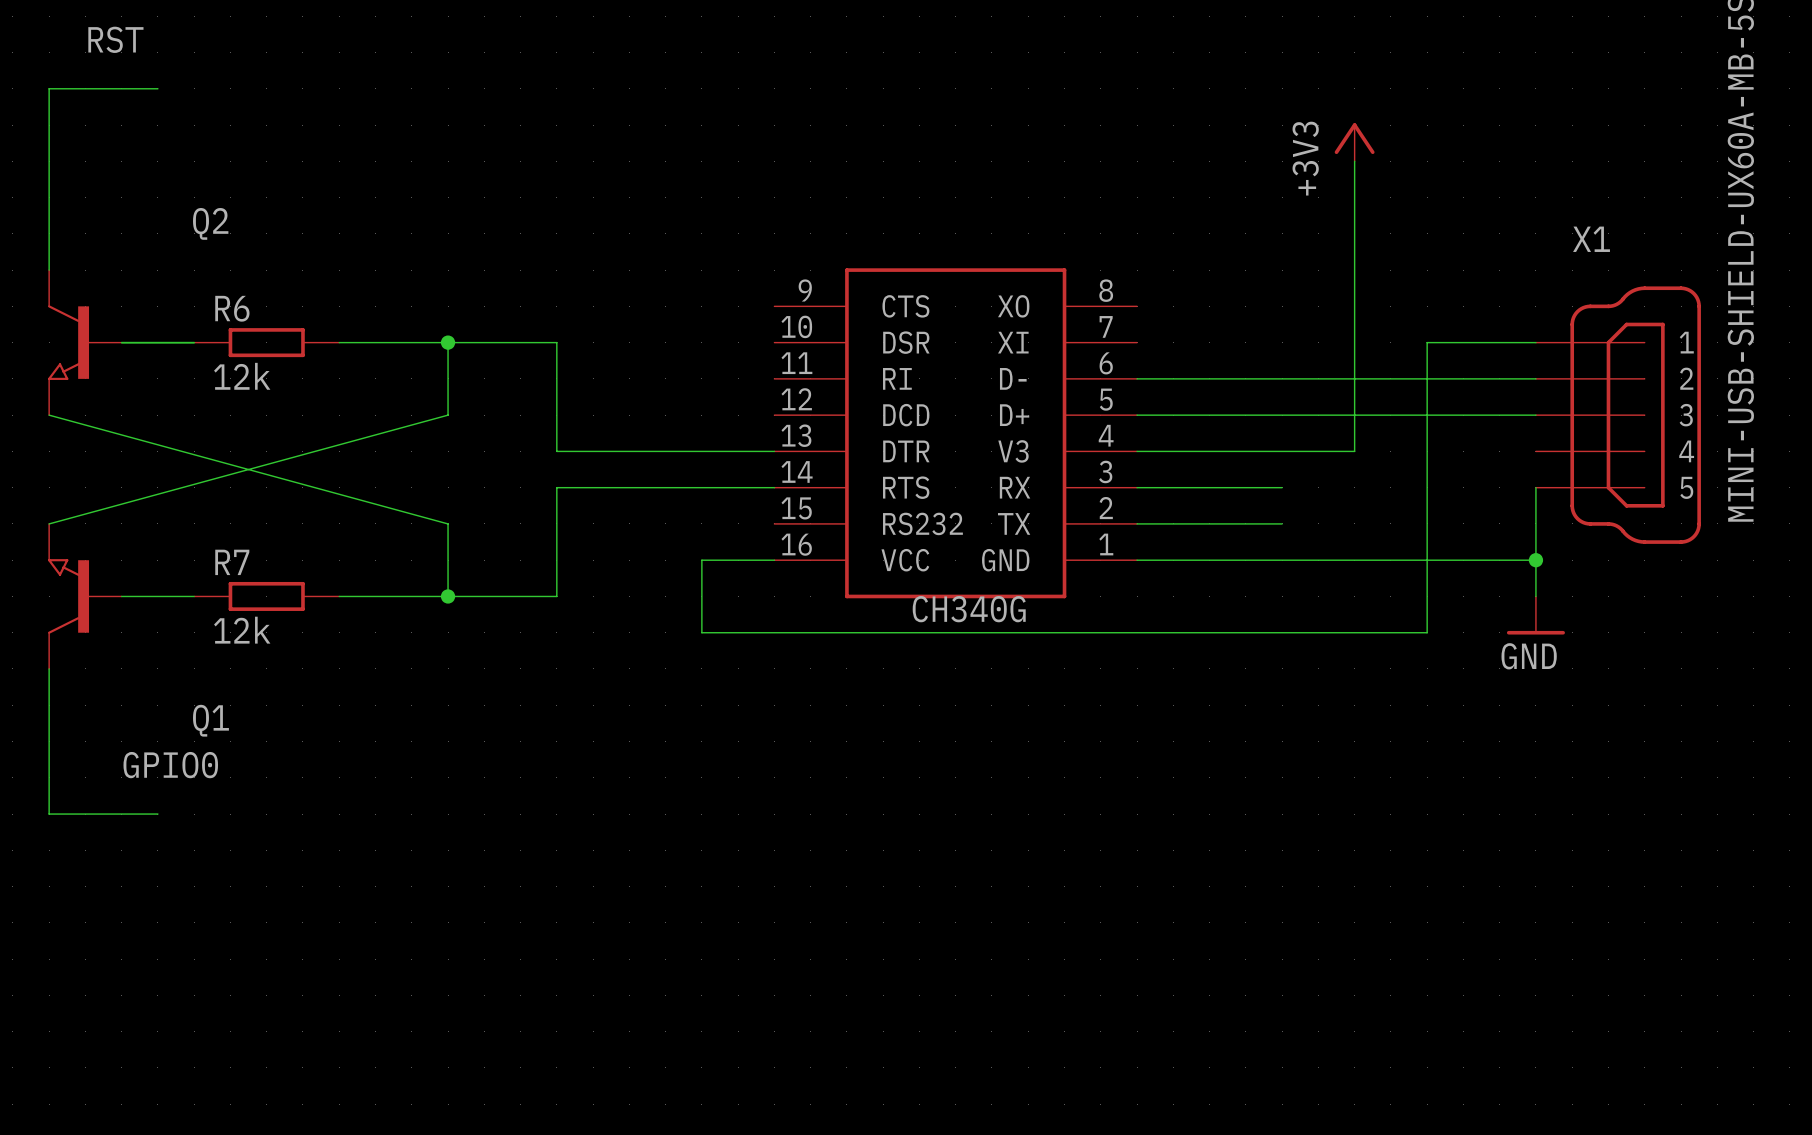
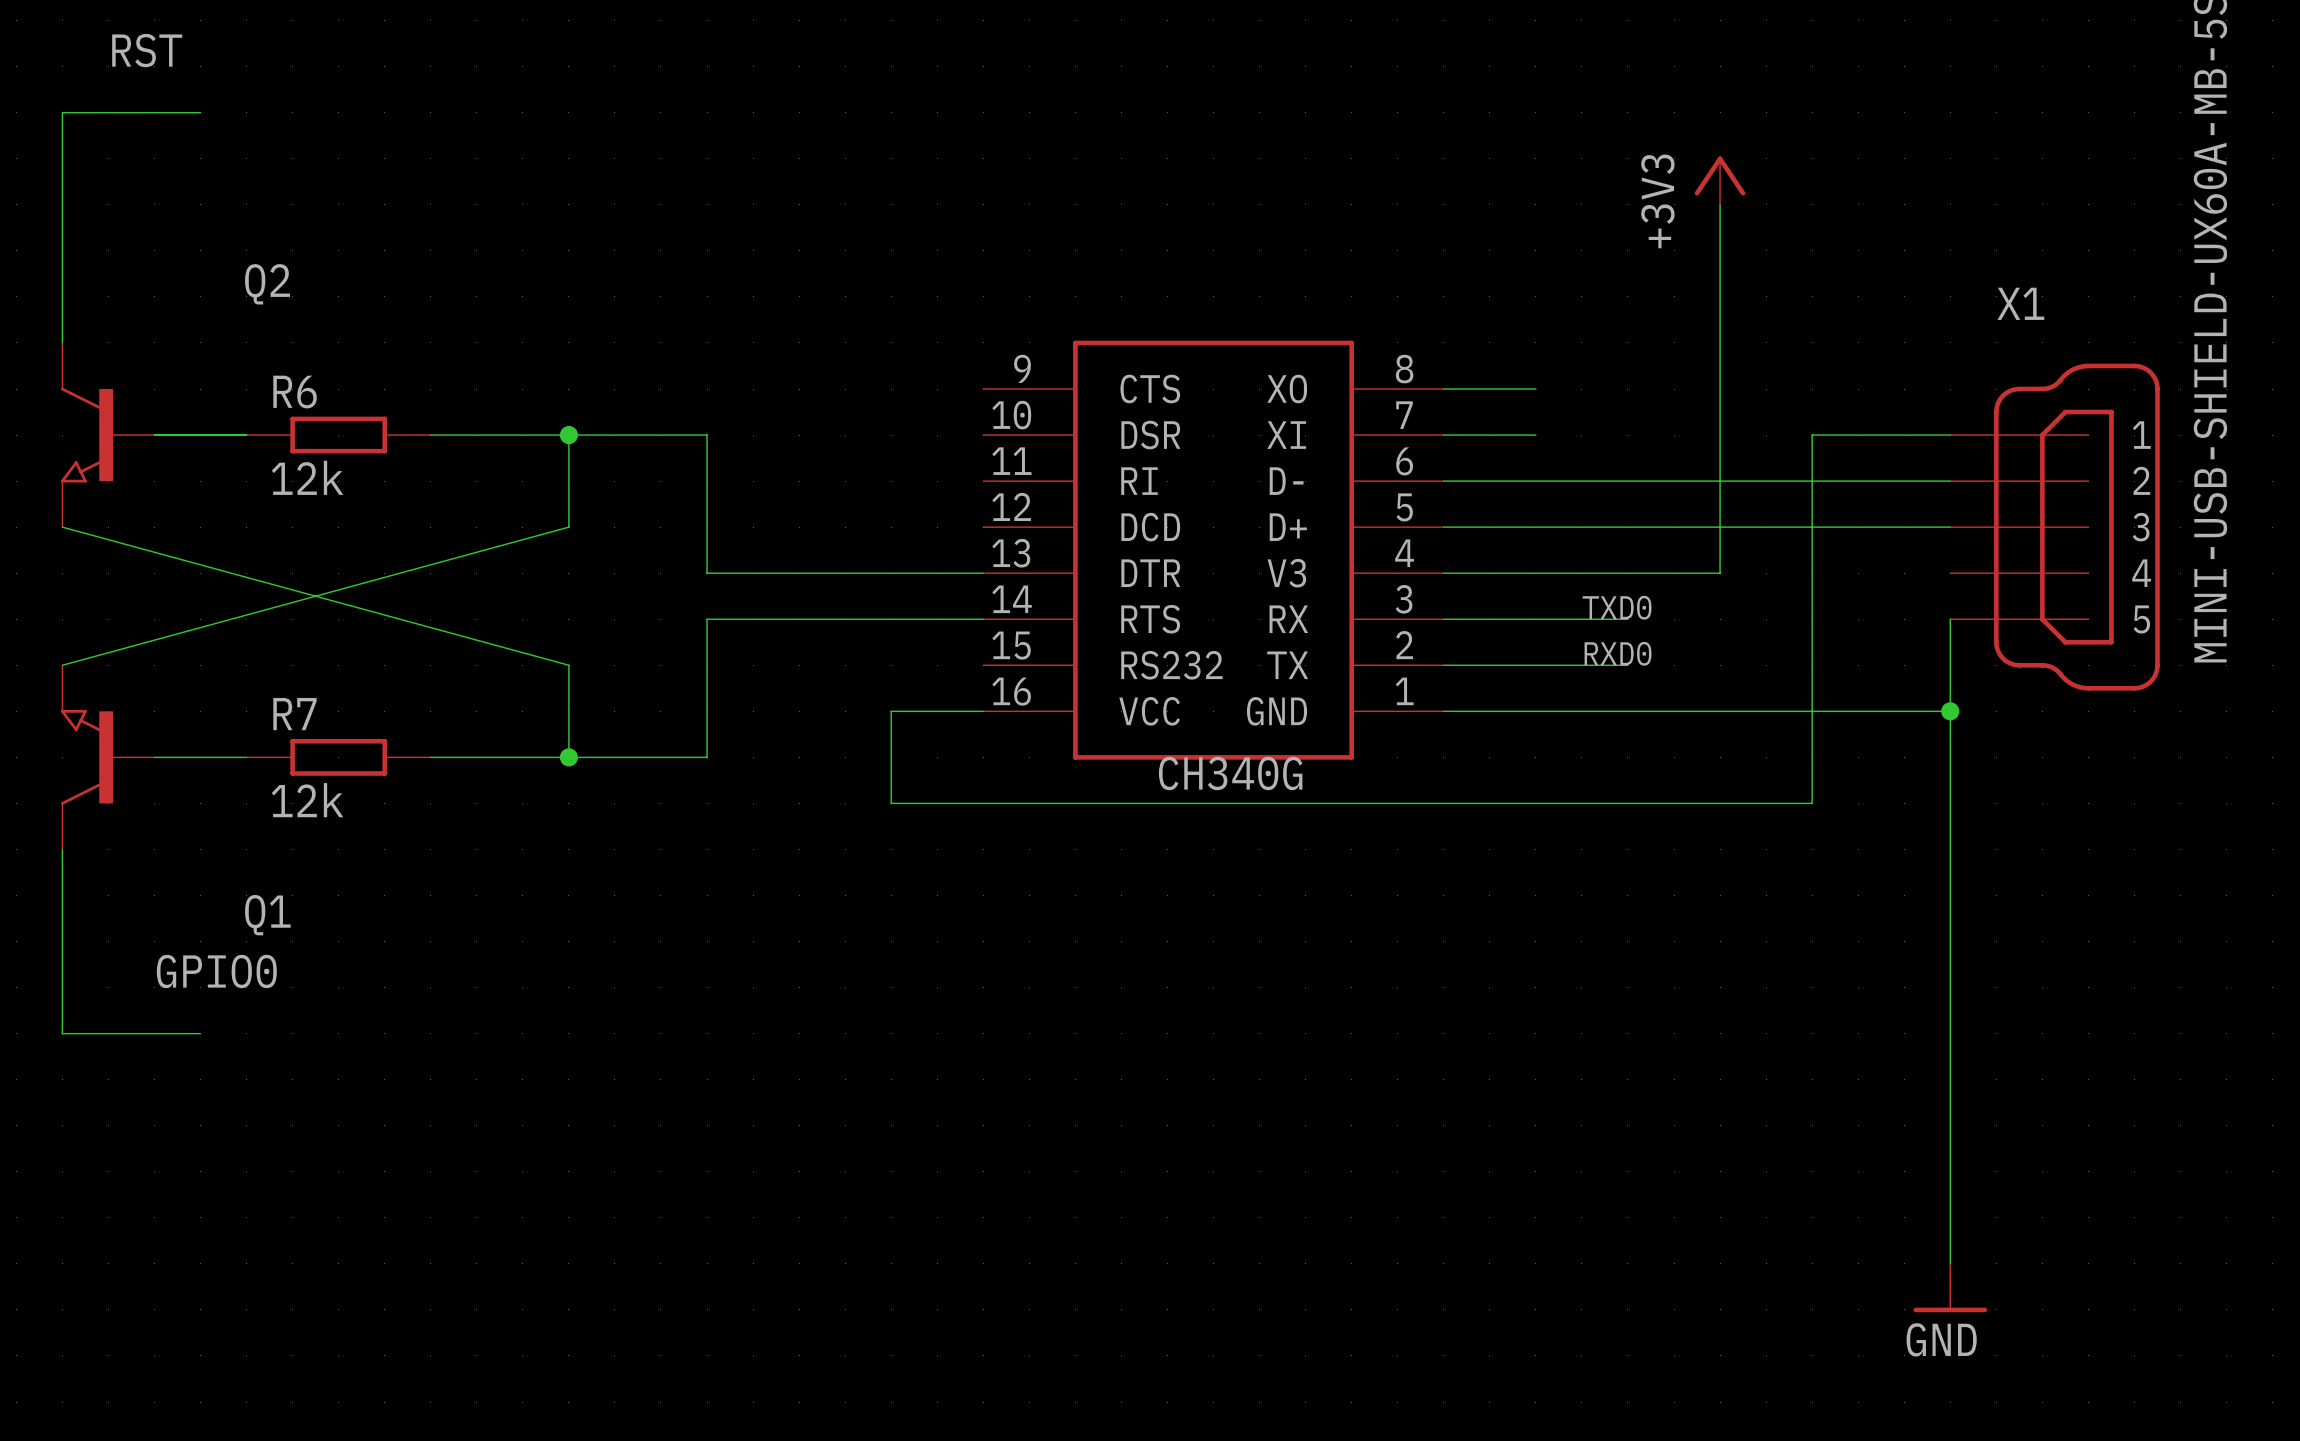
wire: none -> (1443, 389) (1535, 389)
wire: none -> (1443, 435) (1535, 435)
label: none -> TXD0 (1617, 607)
label: none -> RXD0 (1618, 653)
wire: none -> (1950, 757) (1950, 1263)
power symbol: GND (1535, 615) -> none
power symbol: none -> GND (1950, 1288)

